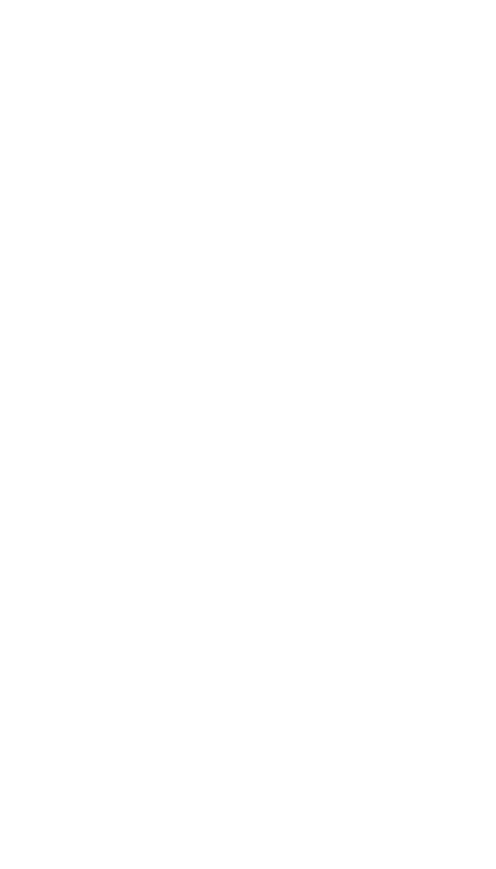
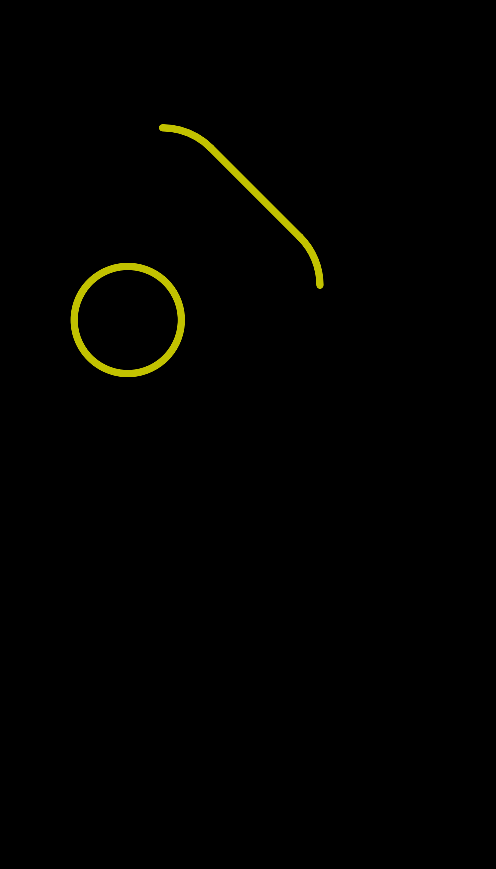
board edge: none -> (210, 147) (300, 237)
board edge: none -> (210, 147) (188, 132) (162, 127) (171, 128) (188, 132) (203, 141) (210, 147)
board edge: none -> (300, 237) (314, 259) (319, 285) (318, 271) (314, 259) (308, 247) (300, 237)
round board edge: none -> [70, 263, 185, 377]

